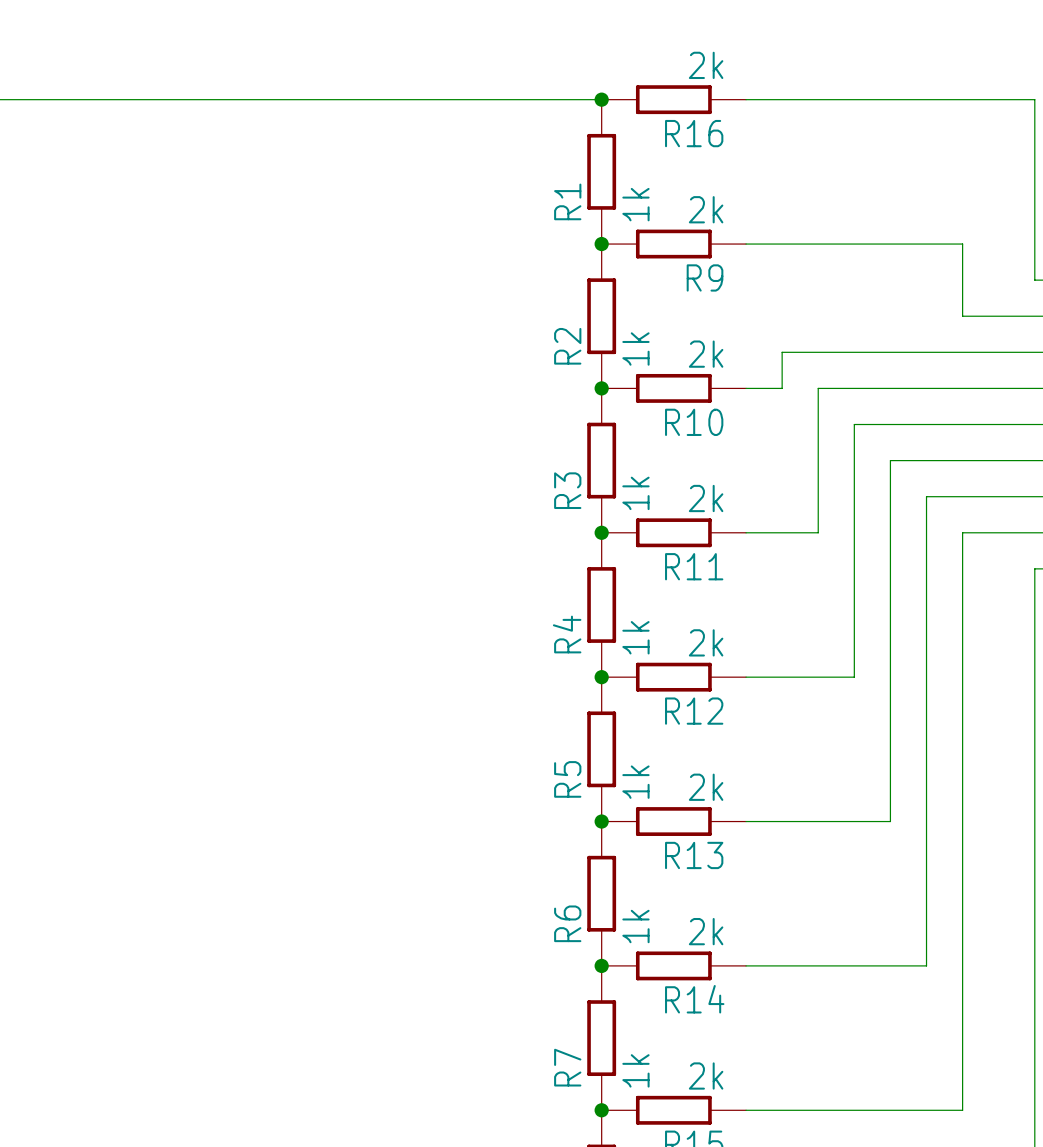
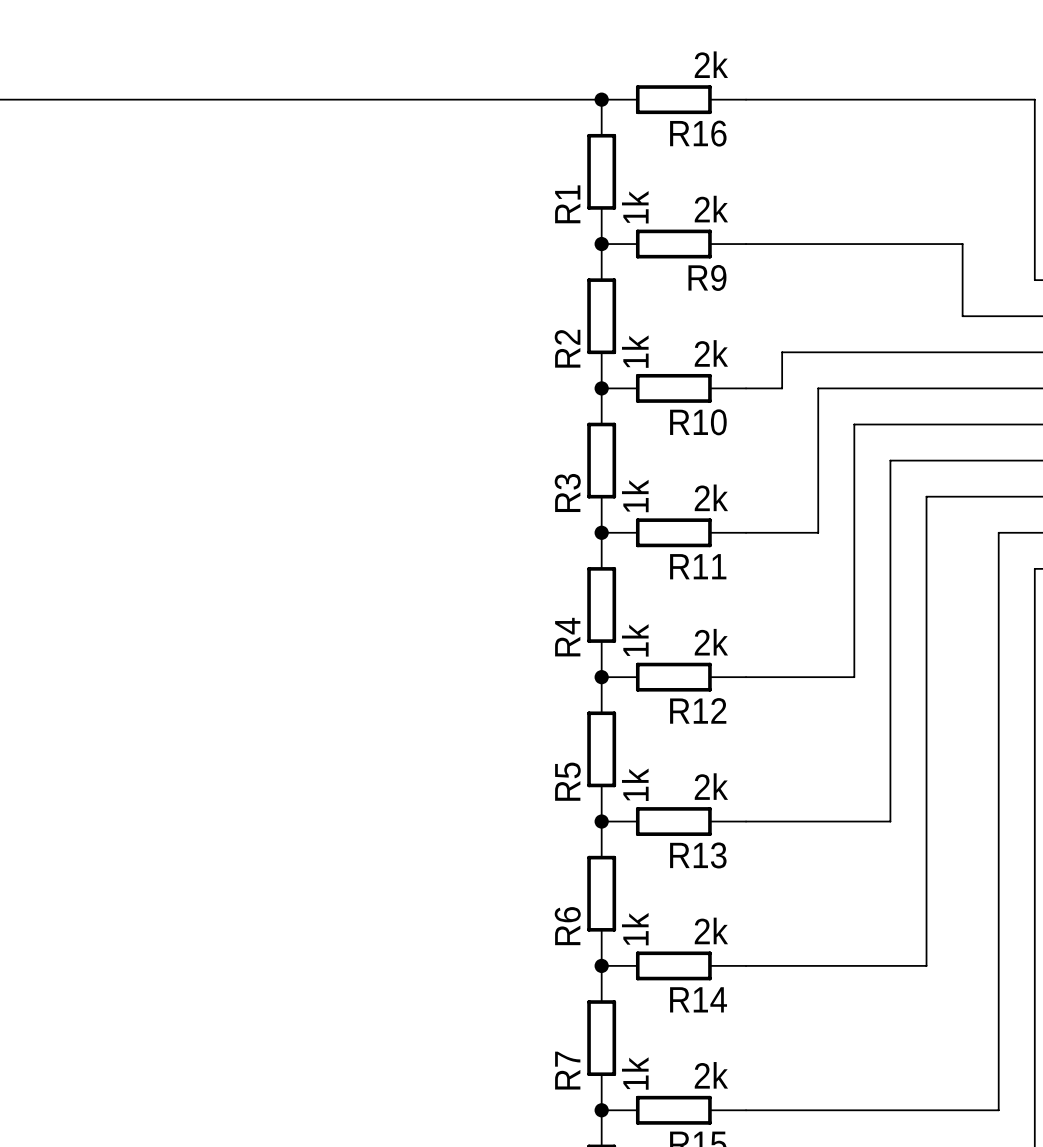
wire: (998, 532) (962, 532) (962, 1110) -> (998, 532) (998, 1110) (962, 1110)

